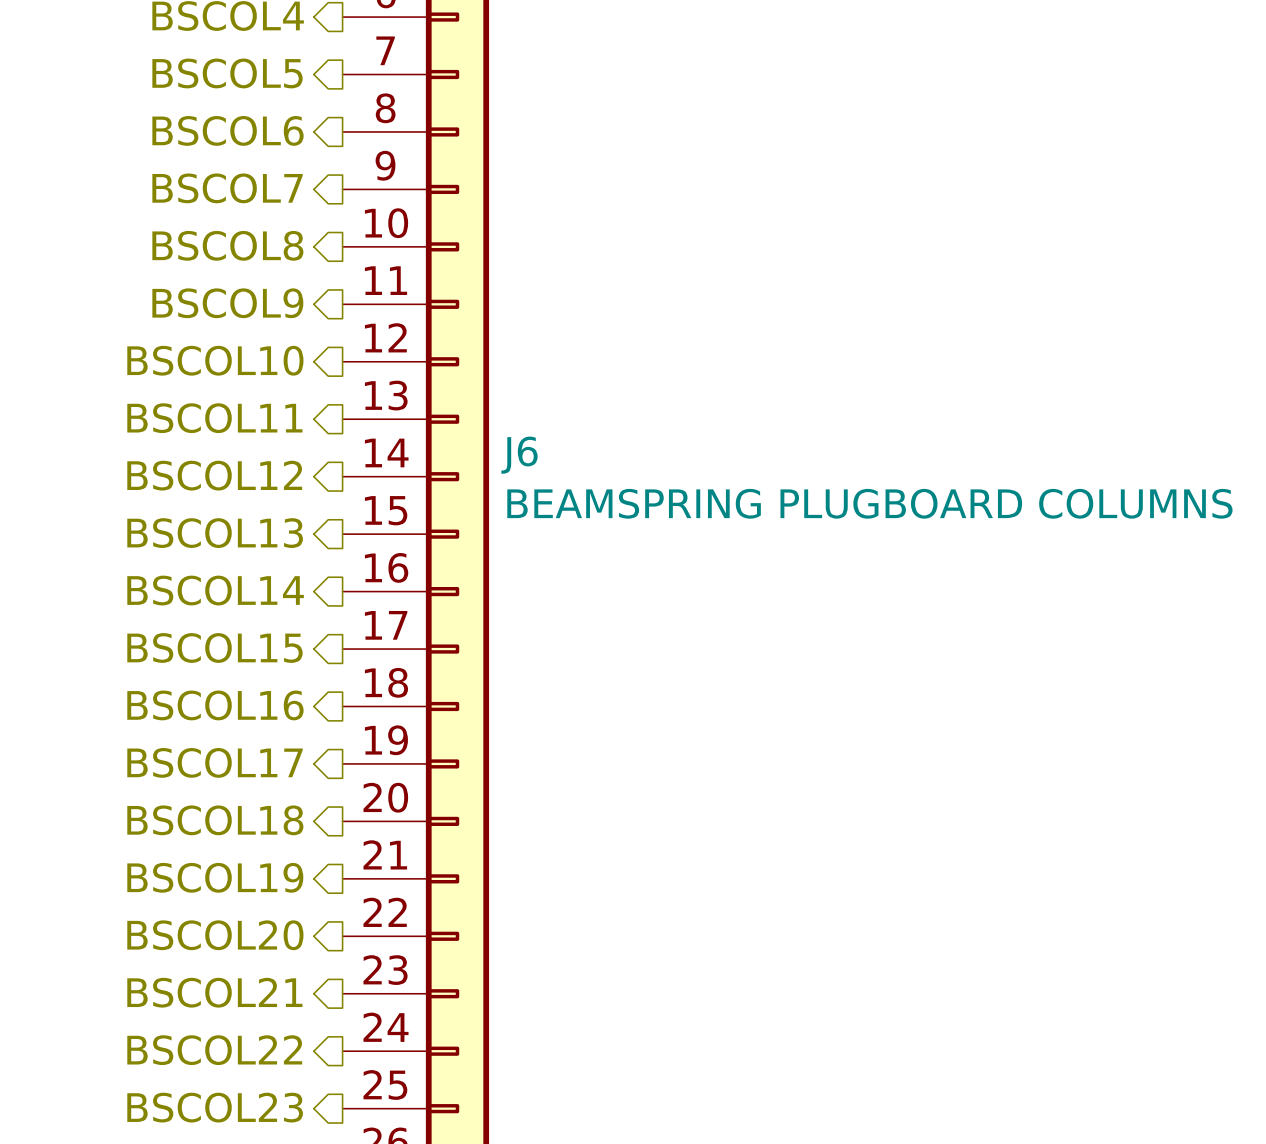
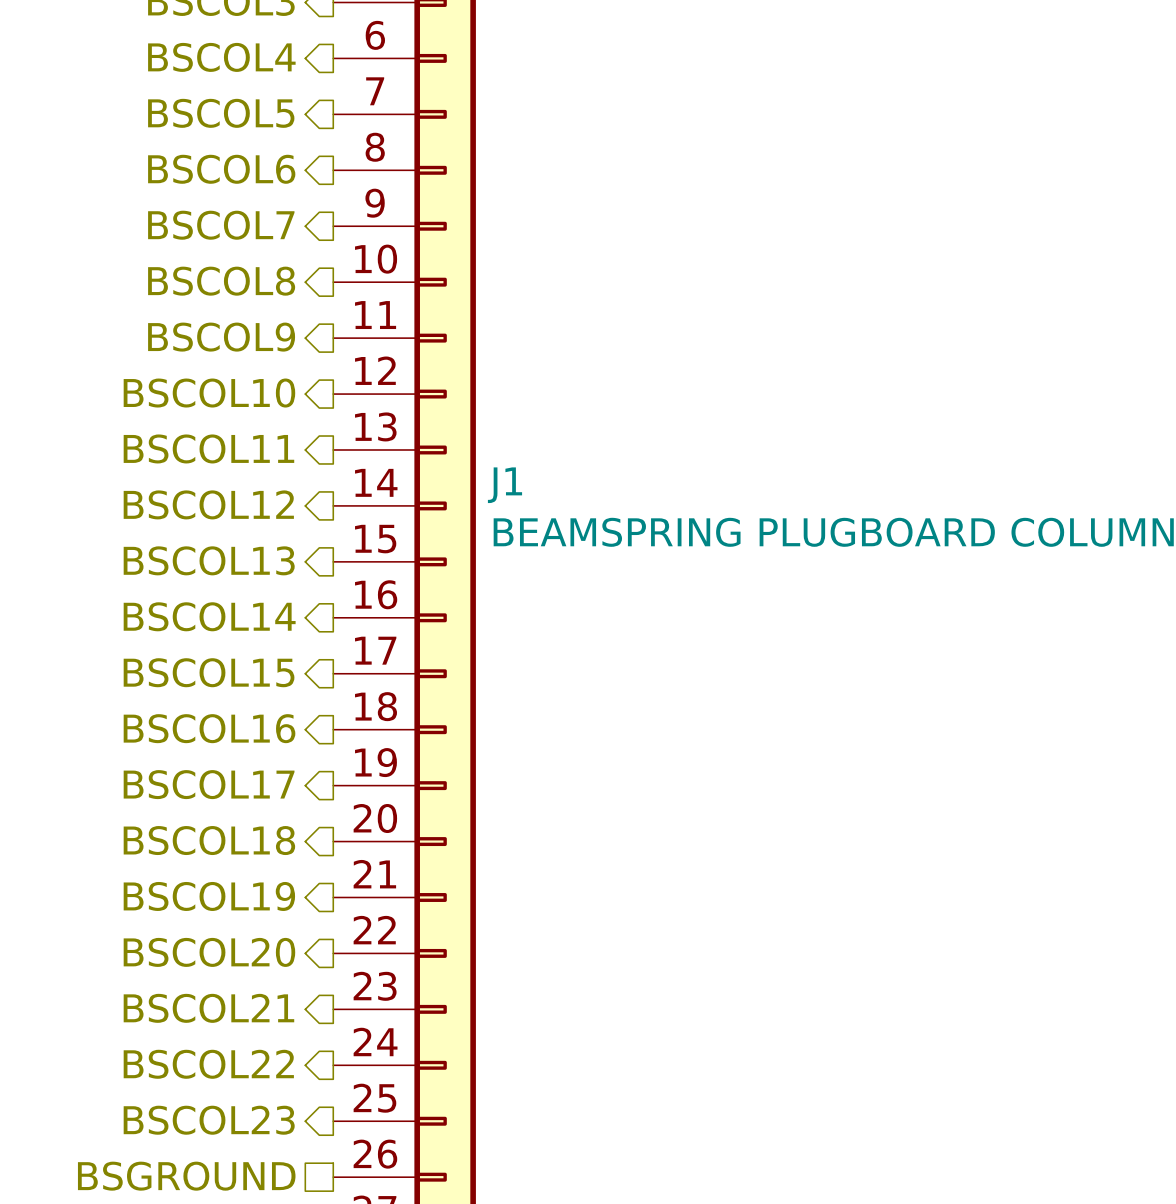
J6 name: J6 (519, 455) -> J1 (505, 485)

